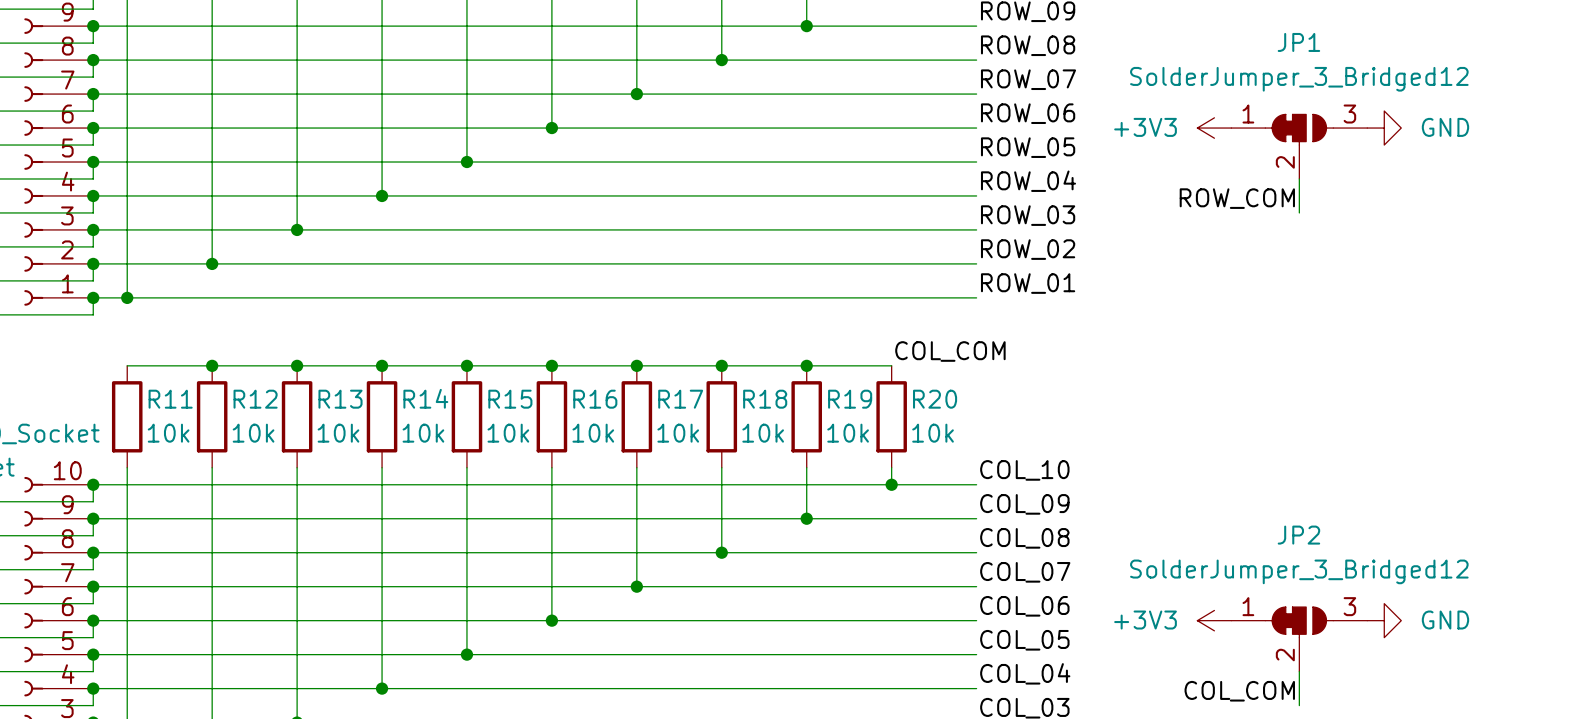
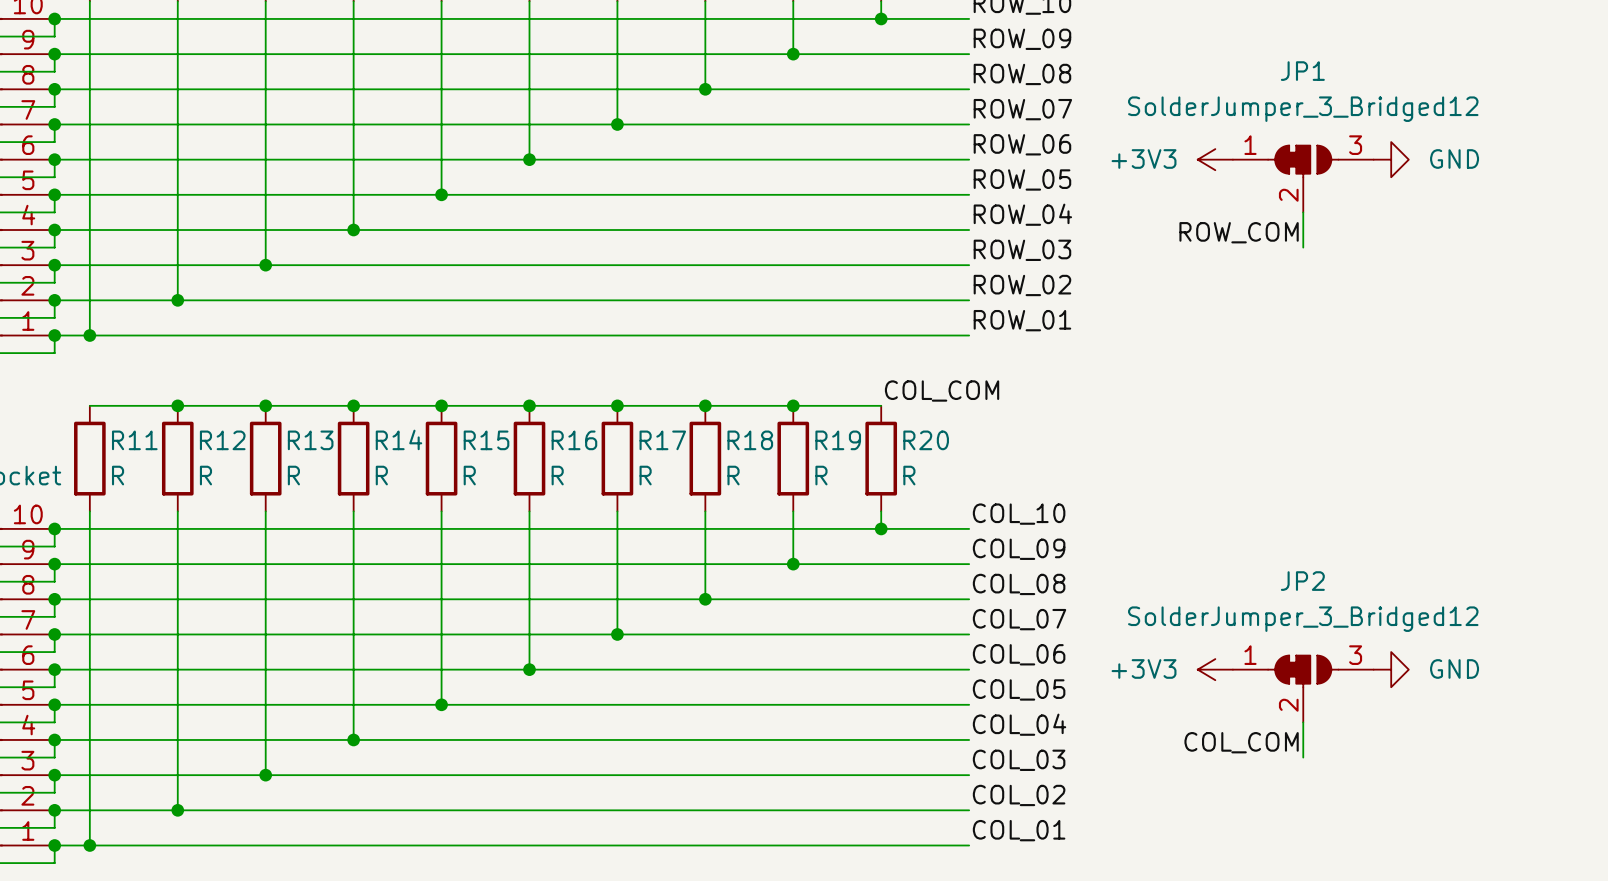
R11 value: 10k (168, 433) -> R (118, 475)
R12 value: 10k (253, 433) -> R (205, 475)
R13 value: 10k (338, 433) -> R (293, 475)
R14 value: 10k (423, 433) -> R (381, 475)
R15 value: 10k (508, 433) -> R (469, 475)
R16 value: 10k (593, 433) -> R (557, 475)
R17 value: 10k (678, 433) -> R (645, 475)
R18 value: 10k (763, 433) -> R (733, 475)
R19 value: 10k (848, 433) -> R (821, 475)
R20 value: 10k (933, 433) -> R (909, 475)

